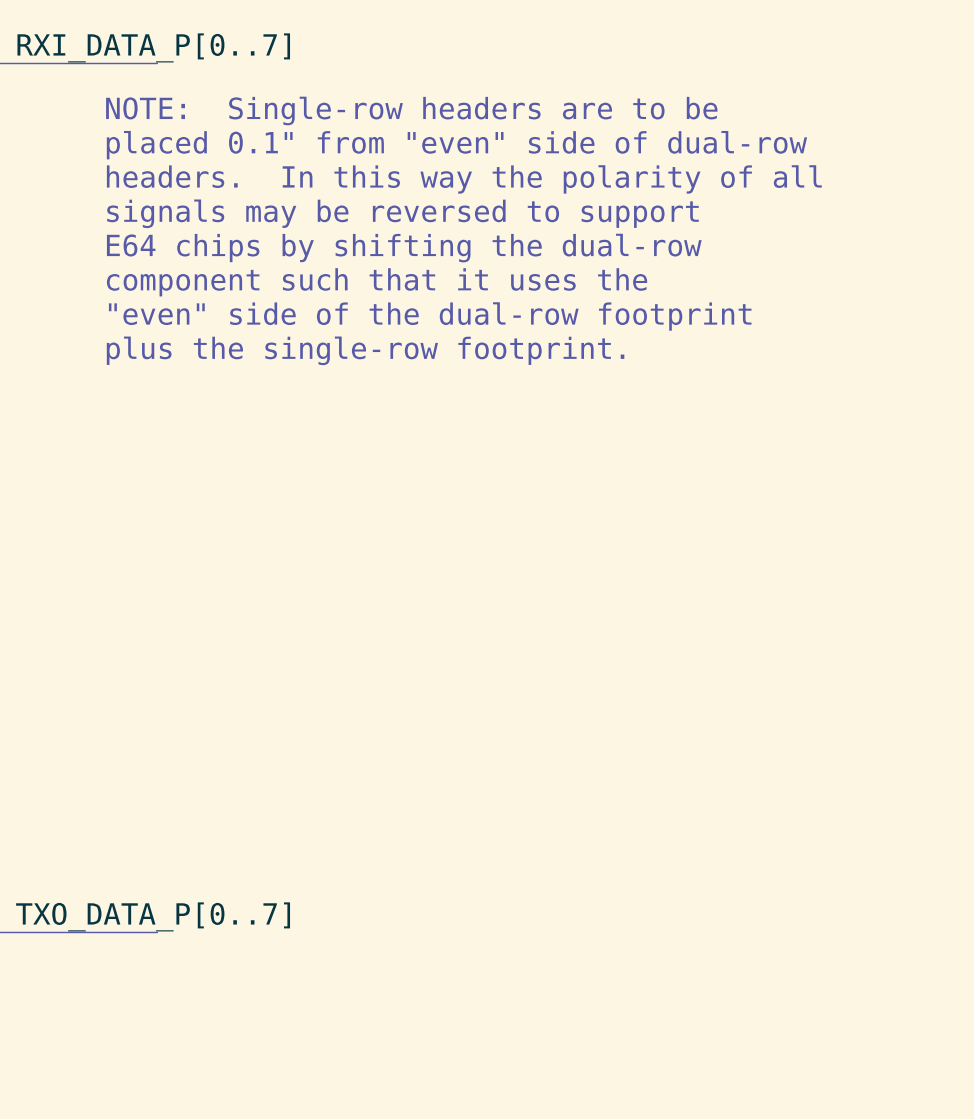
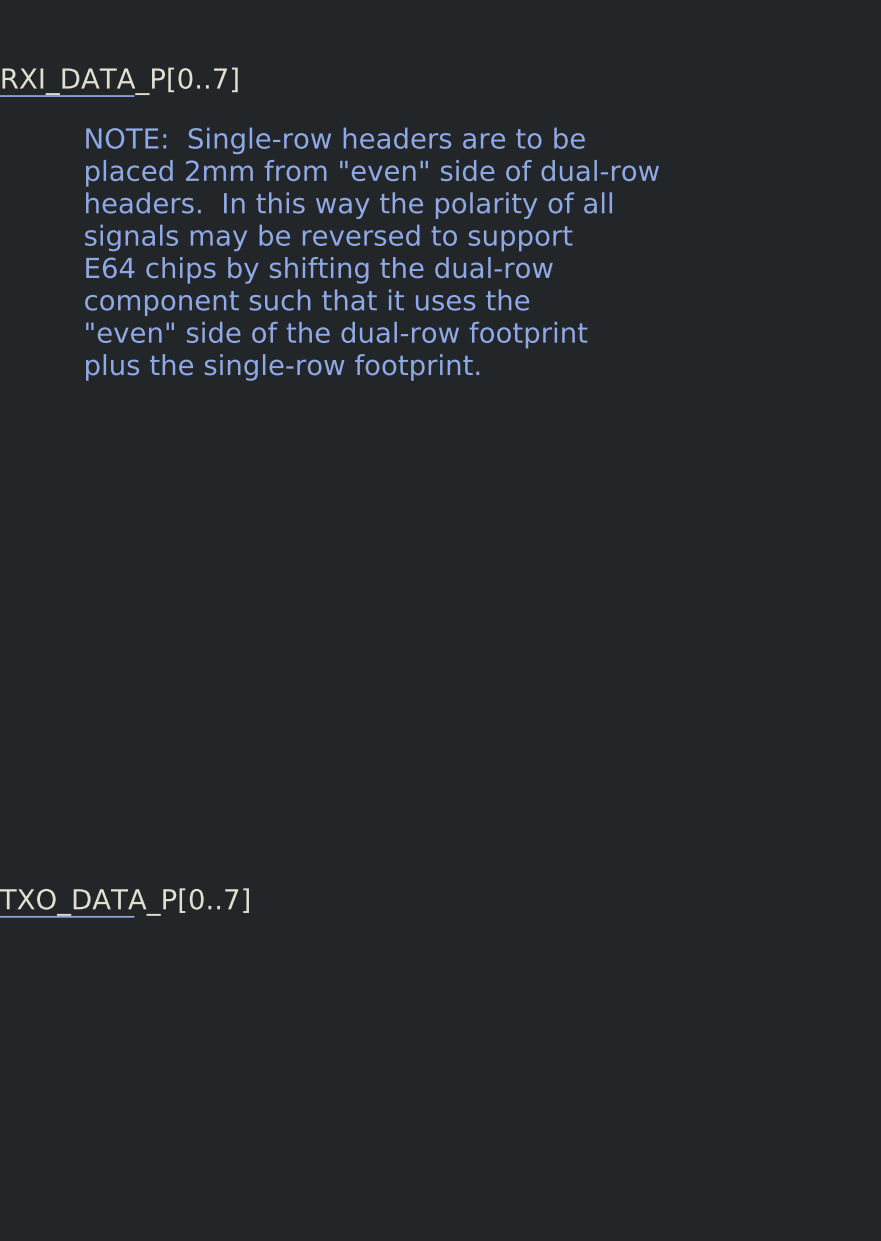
text: placed 0.1" from "even" side of dual-row (456, 145) -> placed 2mm from "even" side of dual-row (372, 173)

